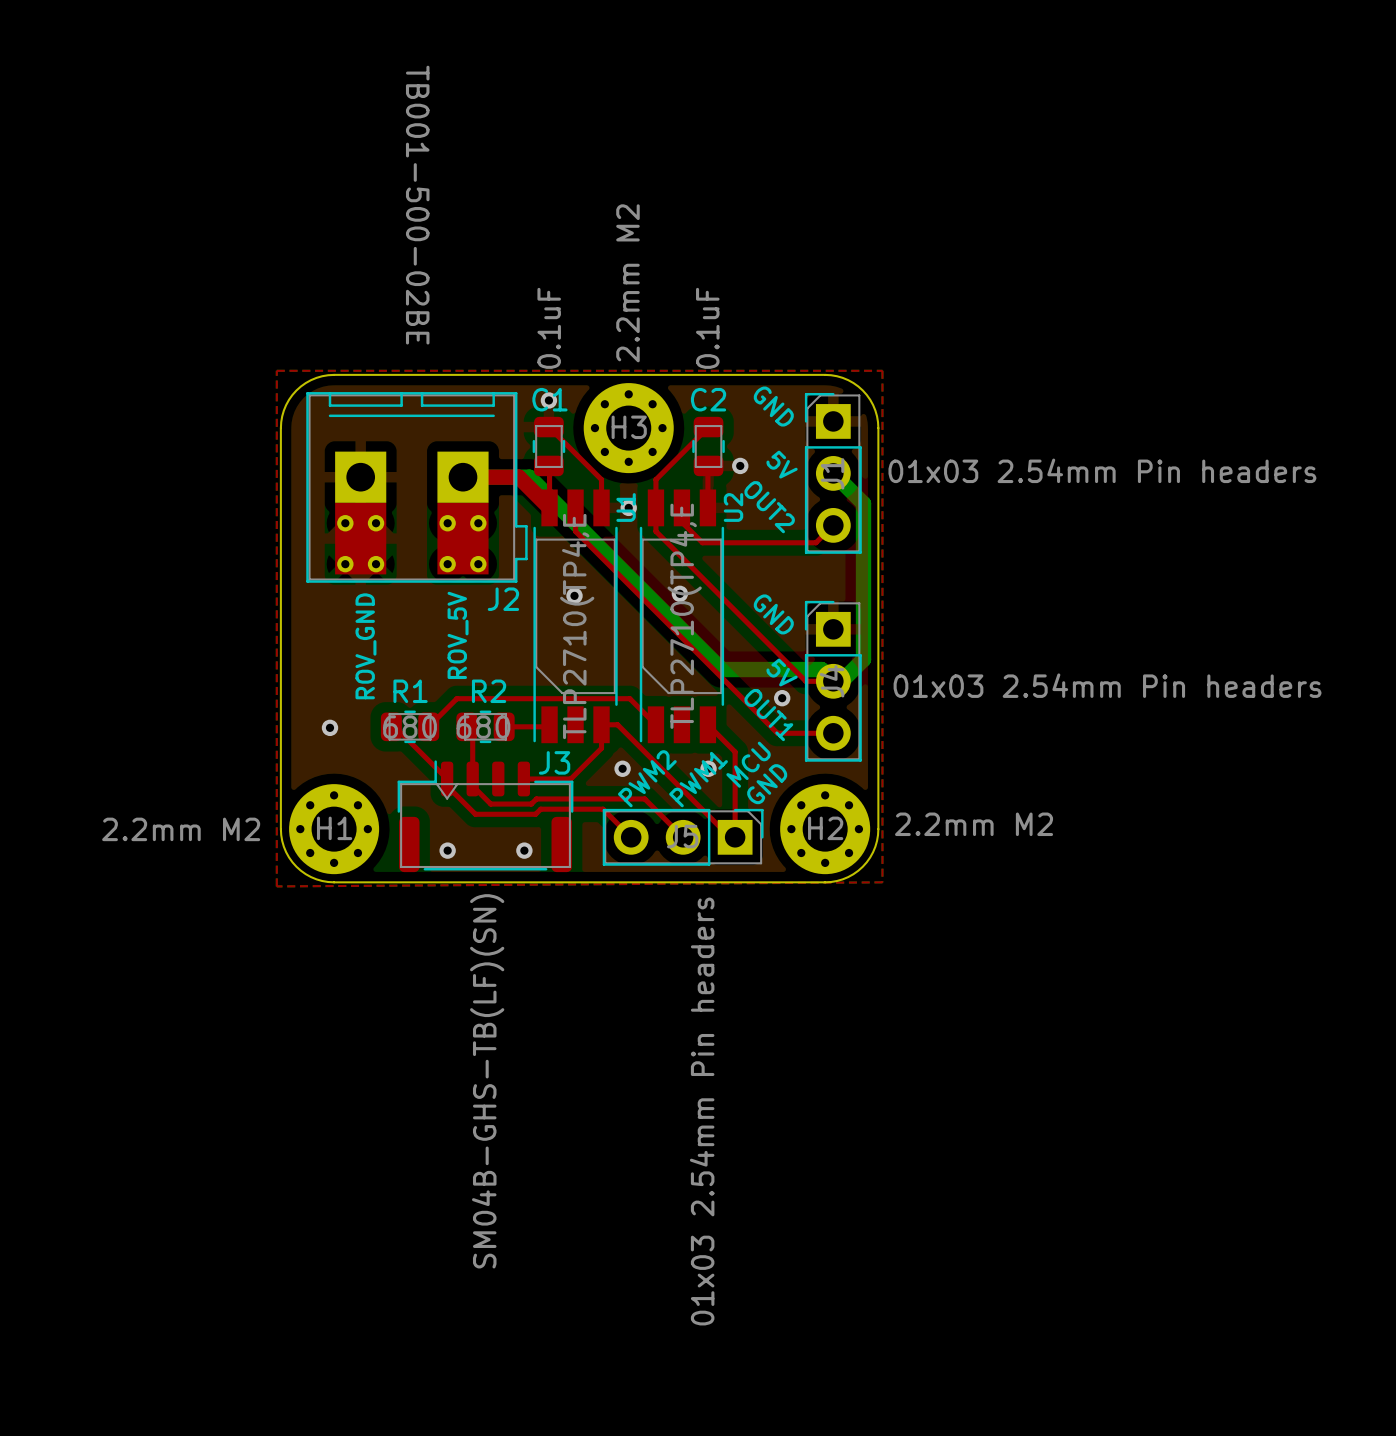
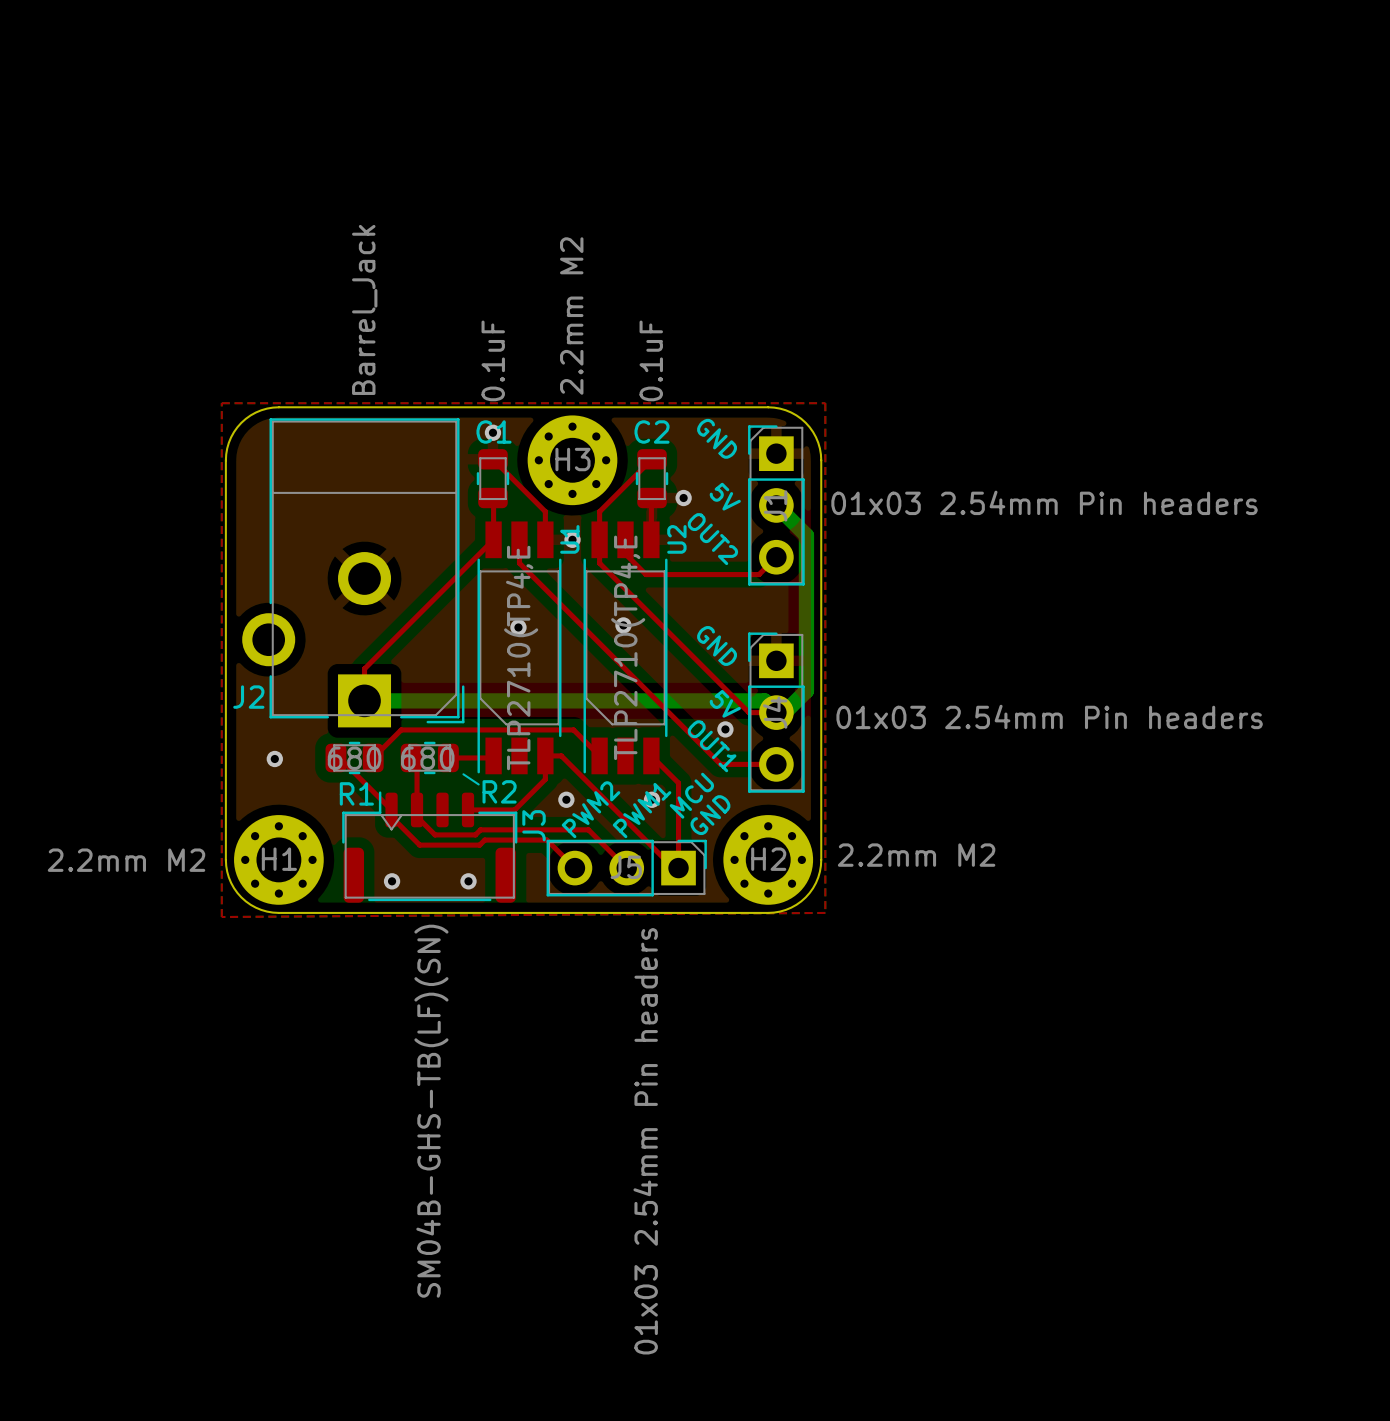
J2 value: TB001-500-02BE (417, 205) -> Barrel_Jack (364, 309)
J2 footprint: [306, 392, 528, 583] -> [242, 418, 465, 728]
top track: (462, 477) (518, 477) (549, 507) -> (364, 700) (364, 668) (493, 539)
bottom track: (462, 477) (529, 477) (721, 669) -> (364, 700) (665, 700)
J2 name position: J2 (503, 599) -> J2 (248, 697)
text: ROV_5V (458, 635) -> none
text: ROV_GND (365, 646) -> none
R1 name position: R1 (410, 691) -> R1 (356, 793)
R2 name position: R2 (489, 691) -> R2 (499, 791)
line: none -> (463, 774) (478, 784)
J3 name rotation: 0° (554, 762) -> 90° counterclockwise (534, 825)
J3 name position: J3 (554, 762) -> J3 (534, 825)

